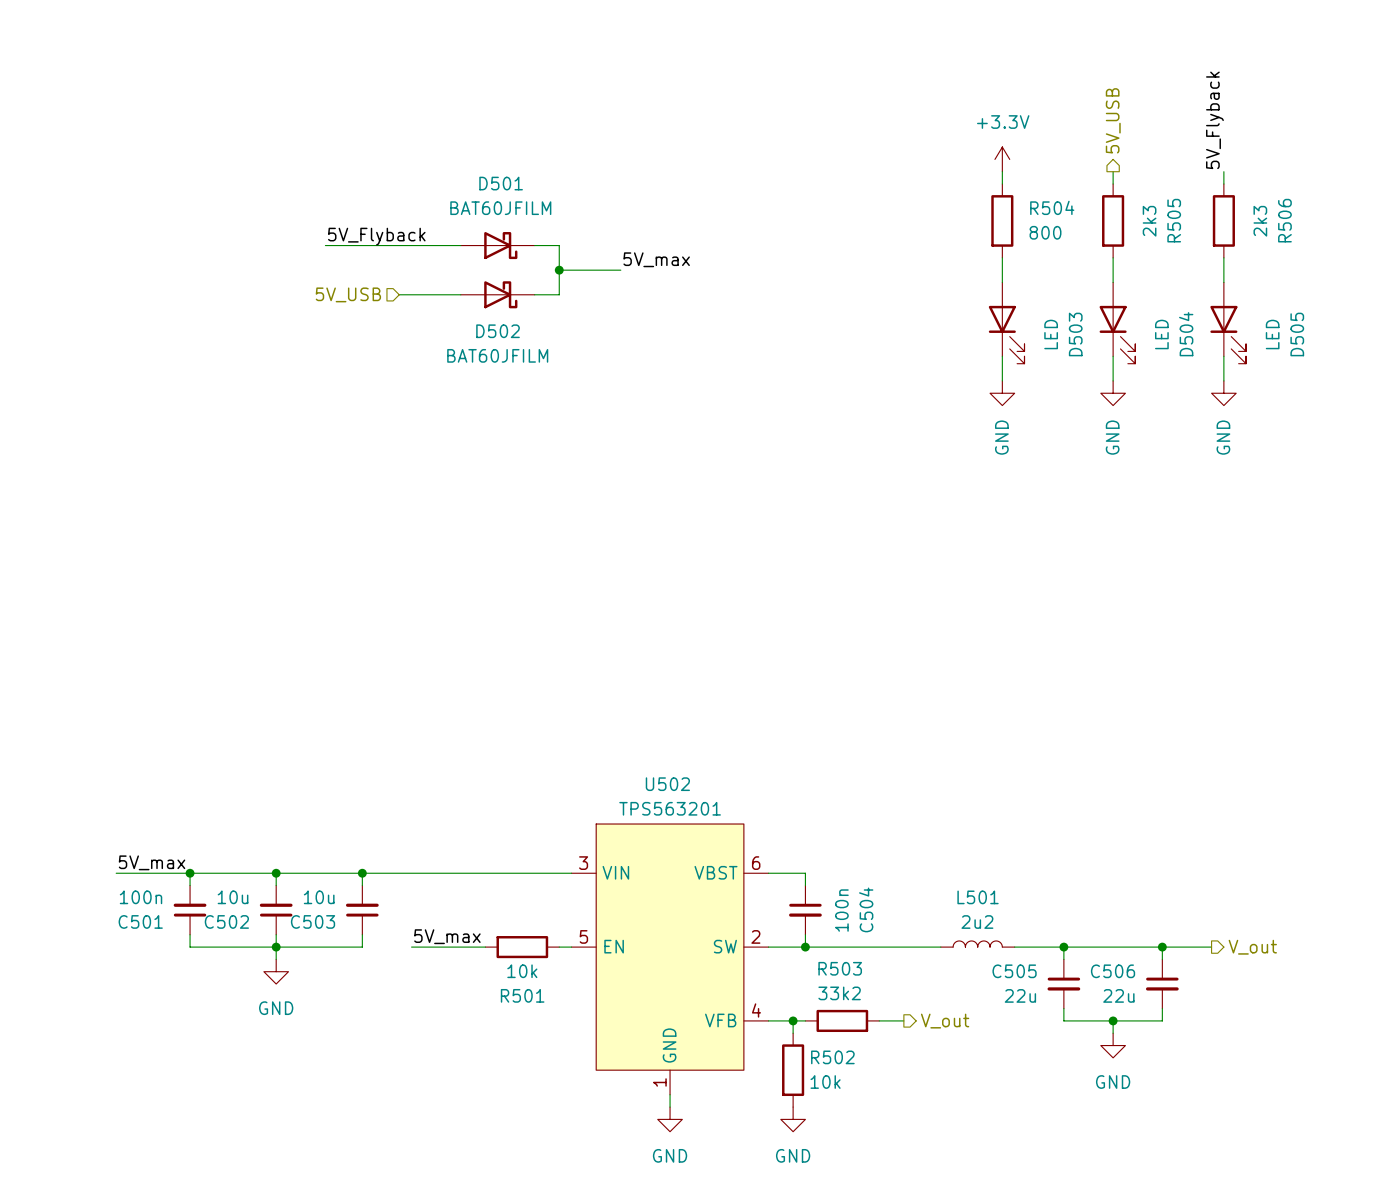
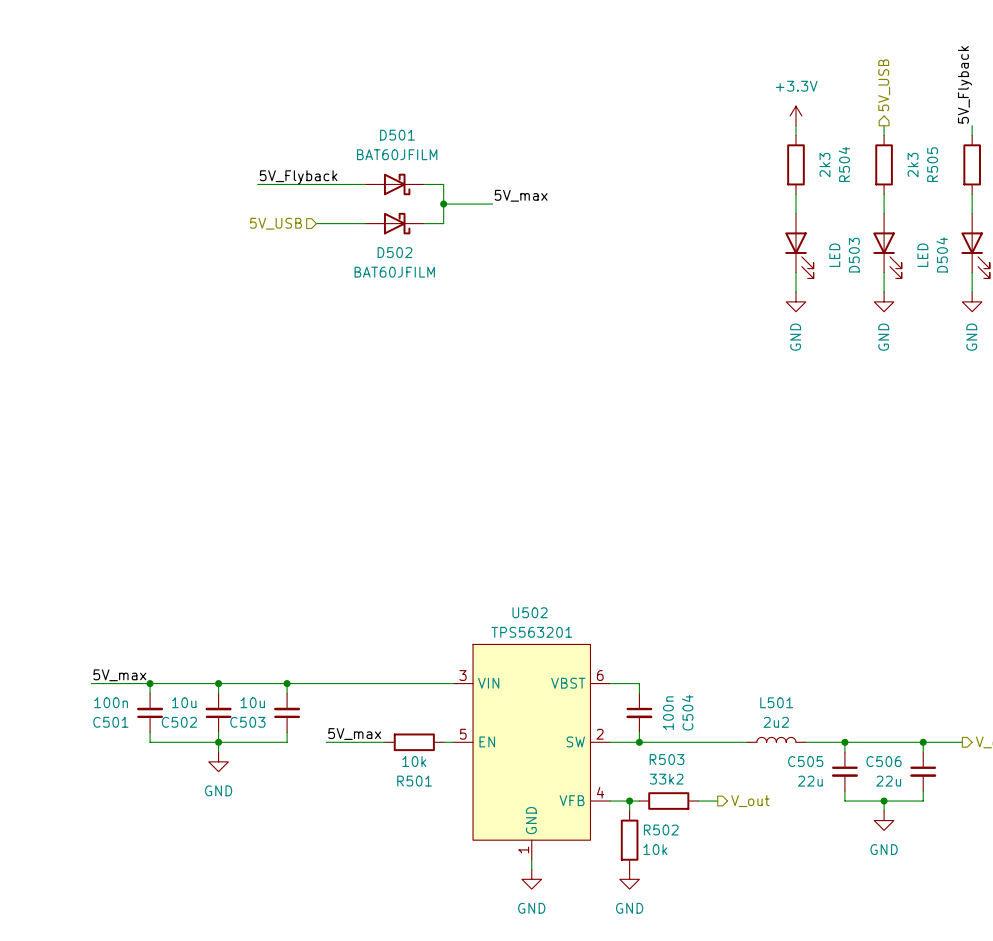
R504 name rotation: 0° (1052, 207) -> 90° counterclockwise (844, 164)
R504 value: 800 (1045, 232) -> 2k3 (824, 165)

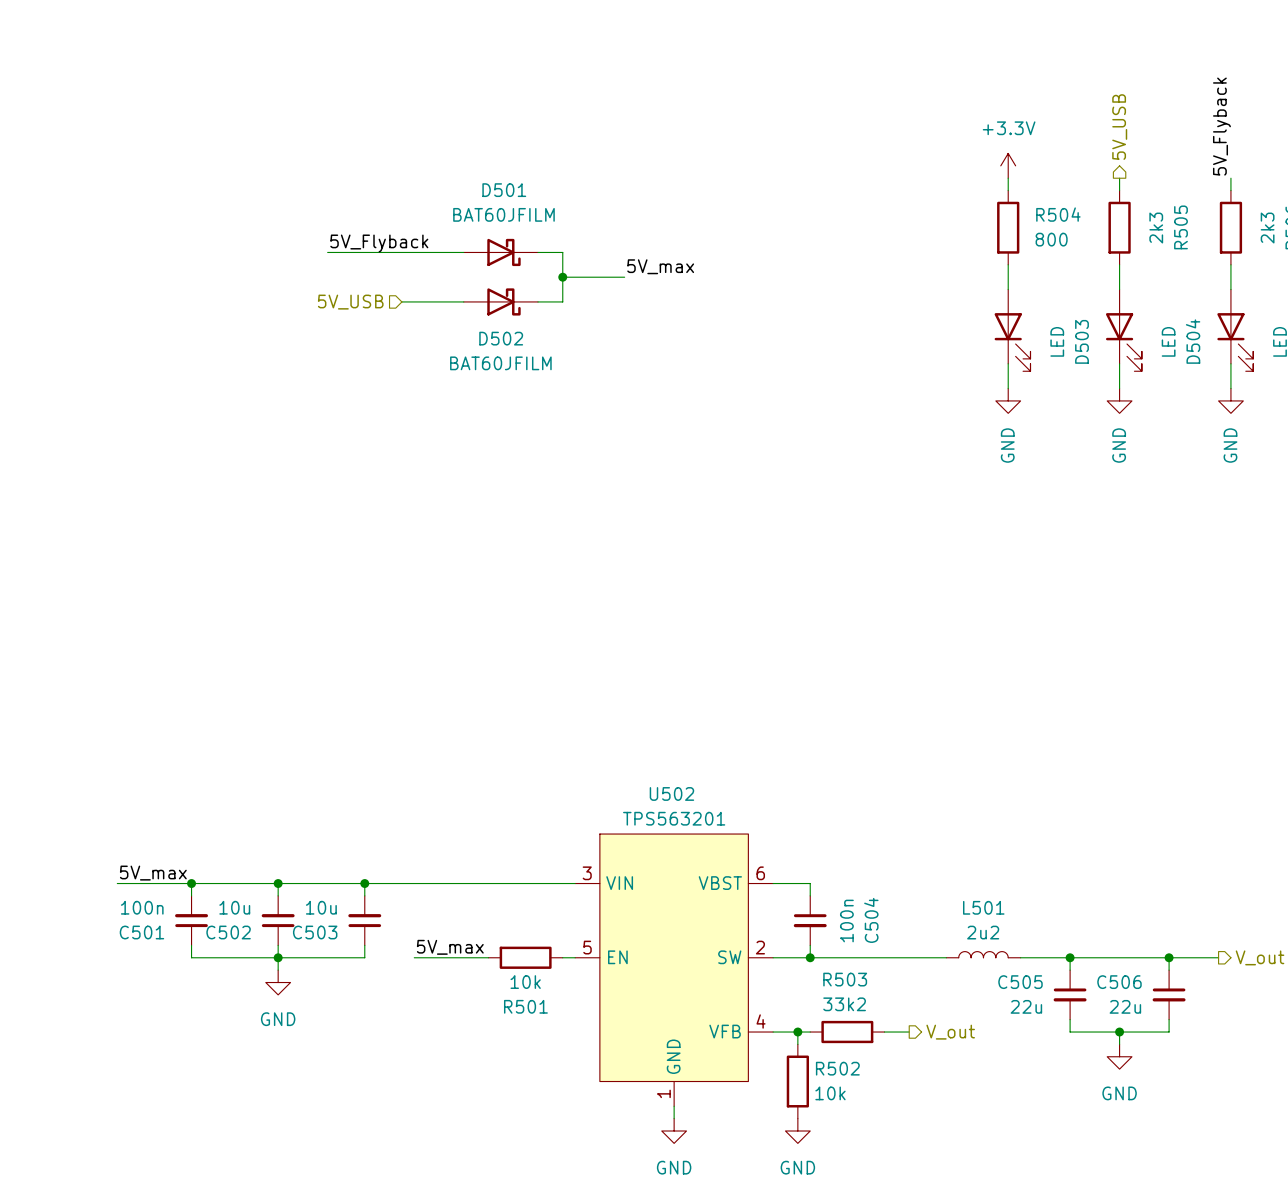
R504 name rotation: 0° (844, 164) -> 90° clockwise (1058, 214)
R504 value: 2k3 (824, 165) -> 800 (1051, 239)

